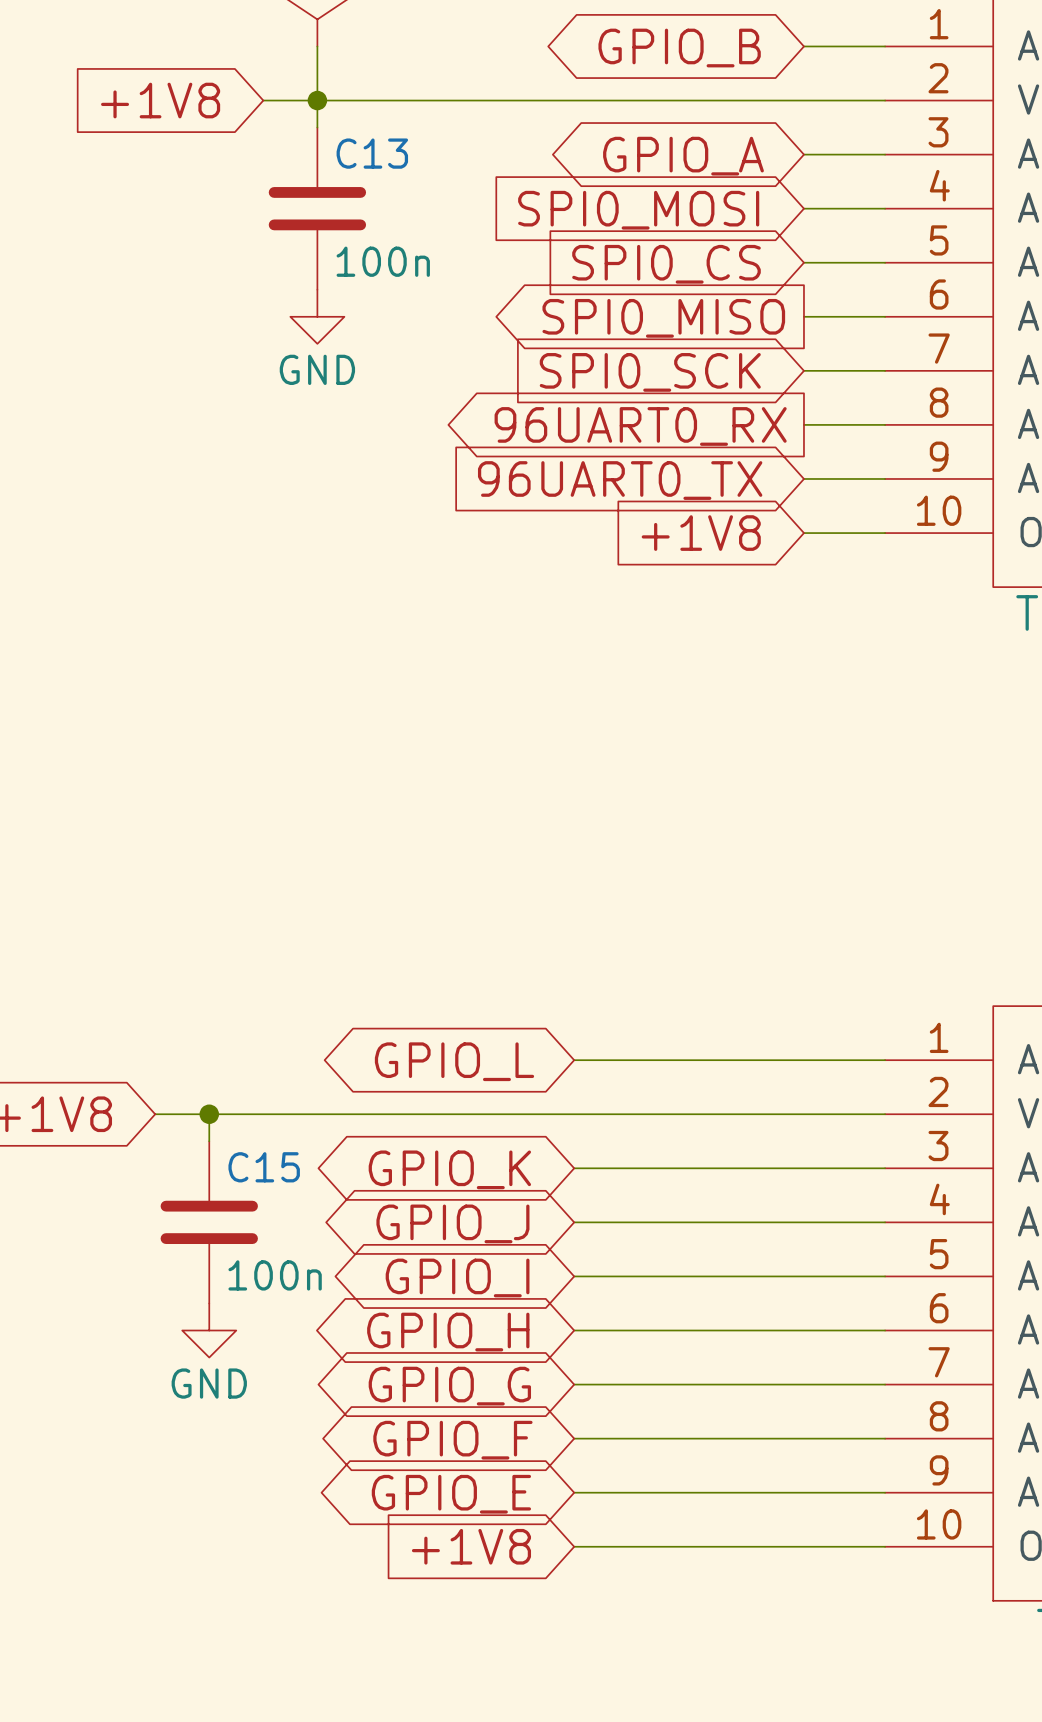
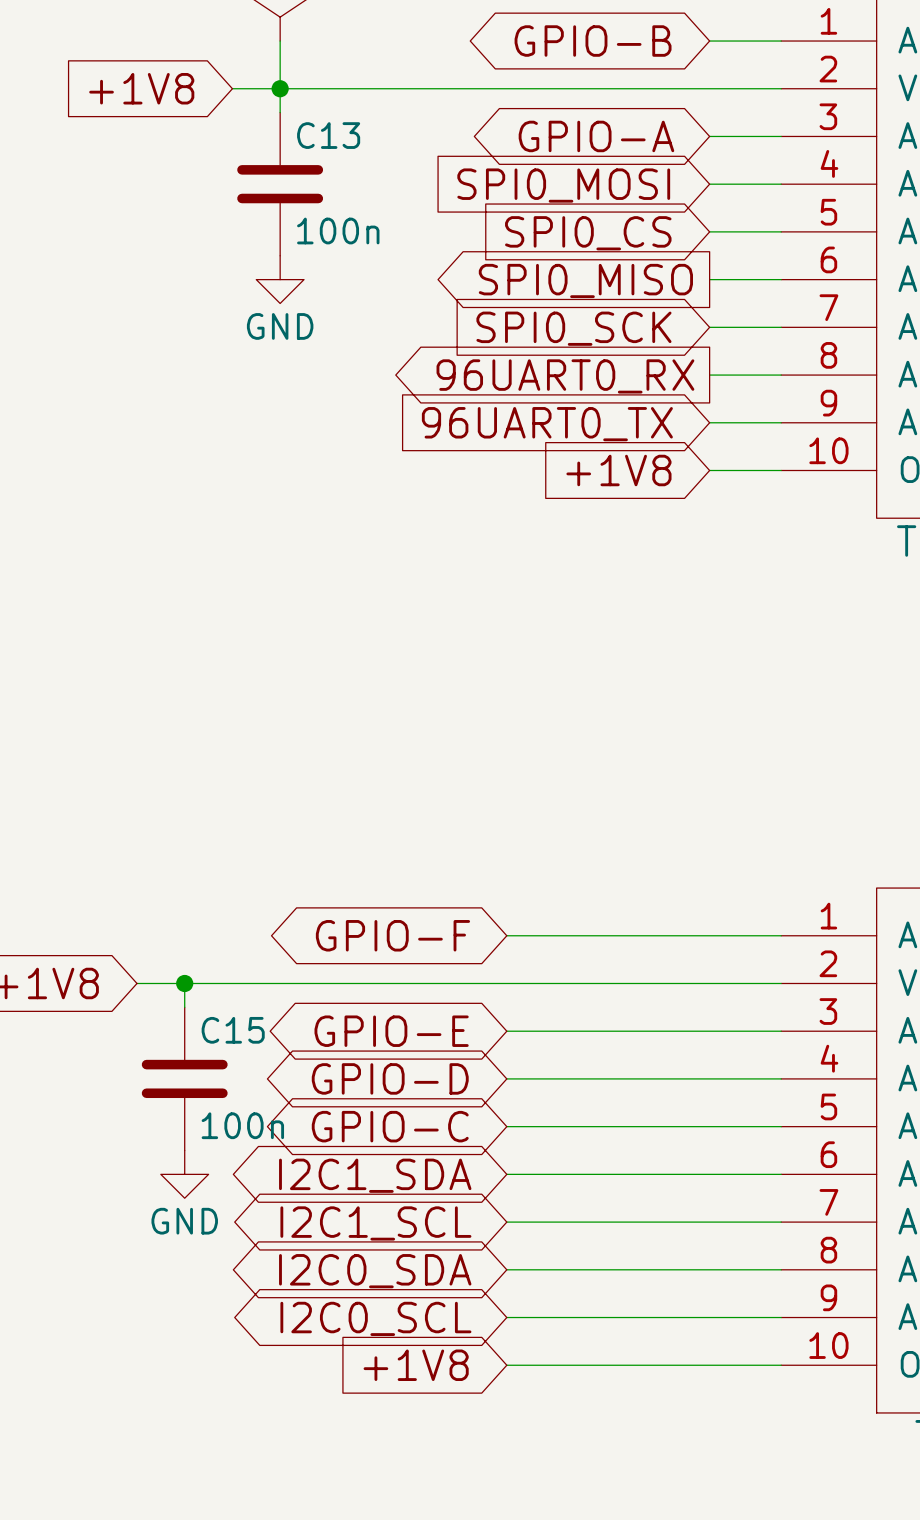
global label: GPIO_B (679, 48) -> GPIO-B (593, 41)
global label: GPIO_A (683, 156) -> GPIO-A (596, 136)
global label: GPIO_L (454, 1061) -> GPIO-F (392, 935)
global label: GPIO_K (449, 1169) -> GPIO-E (391, 1031)
global label: GPIO_J (452, 1223) -> GPIO-D (390, 1078)
global label: GPIO_I (457, 1277) -> GPIO-C (390, 1126)
global label: GPIO_H (448, 1332) -> I2C1_SDA (375, 1175)
global label: GPIO_G (449, 1386) -> I2C1_SCL (375, 1223)
global label: GPIO_F (452, 1440) -> I2C0_SDA (375, 1271)
global label: GPIO_E (451, 1494) -> I2C0_SCL (375, 1318)

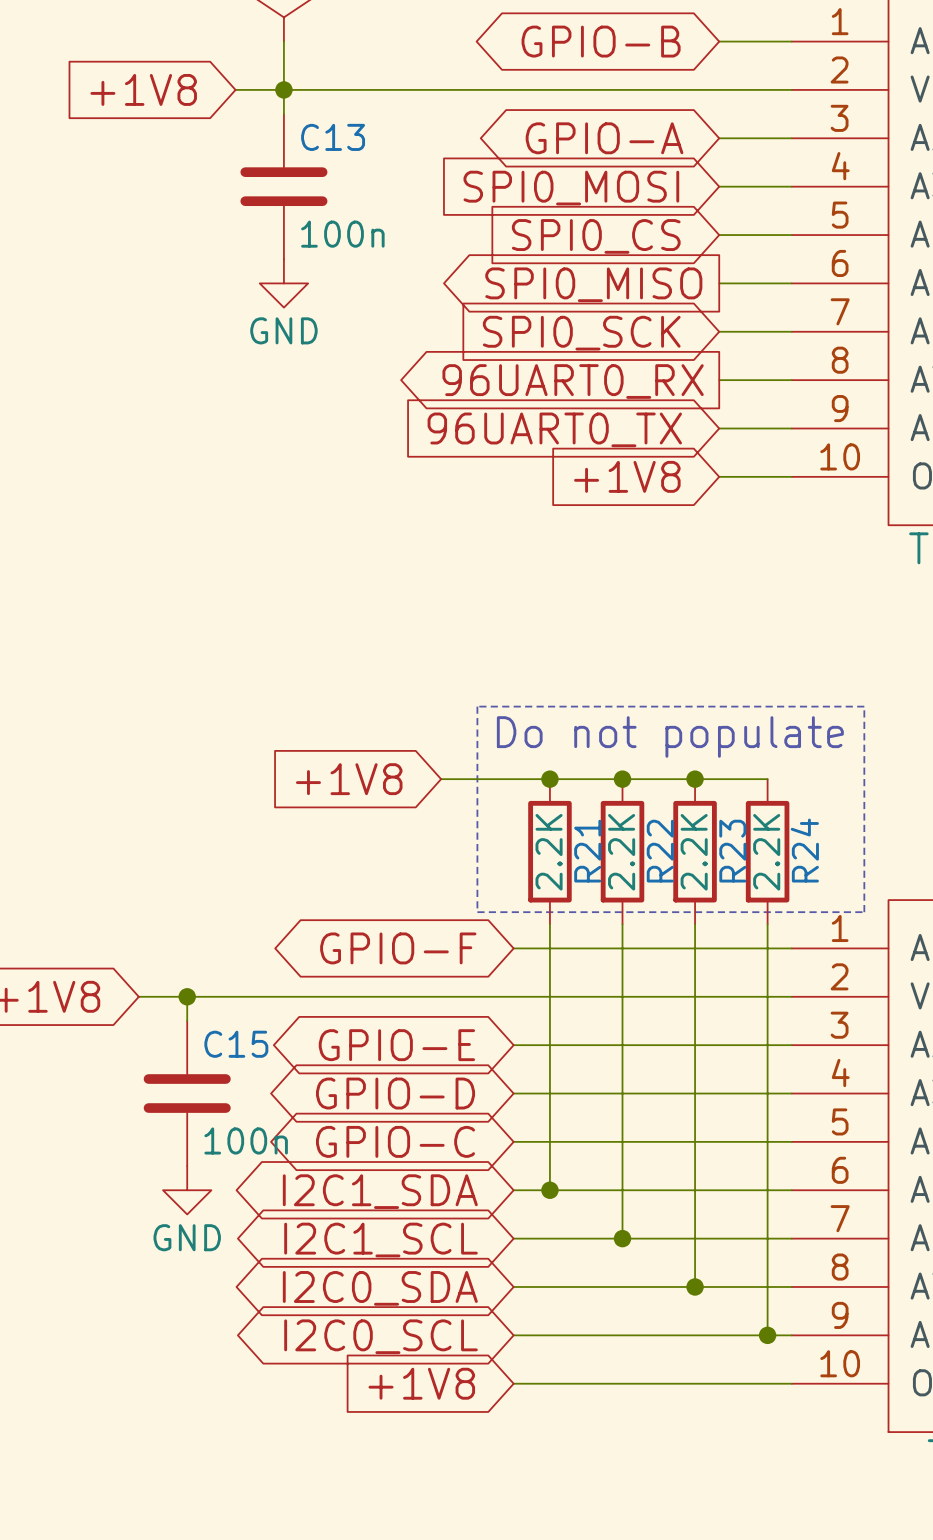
line: none -> (477, 706) (864, 706) (864, 912) (477, 912) (477, 706)
text: none -> Do not populate (670, 736)
global label: none -> +1V8 (349, 779)
wire: none -> (441, 779) (767, 779)
junction: none -> (549, 779)
junction: none -> (622, 779)
junction: none -> (695, 779)
R21: none -> 2.2K (549, 851)
R22: none -> 2.2K (622, 851)
R23: none -> 2.2K (695, 851)
R24: none -> 2.2K (767, 851)
wire: none -> (549, 924) (549, 1190)
wire: none -> (622, 924) (622, 1238)
wire: none -> (695, 924) (695, 1286)
wire: none -> (767, 924) (767, 1335)
junction: none -> (549, 1190)
junction: none -> (622, 1238)
junction: none -> (695, 1286)
junction: none -> (767, 1335)

